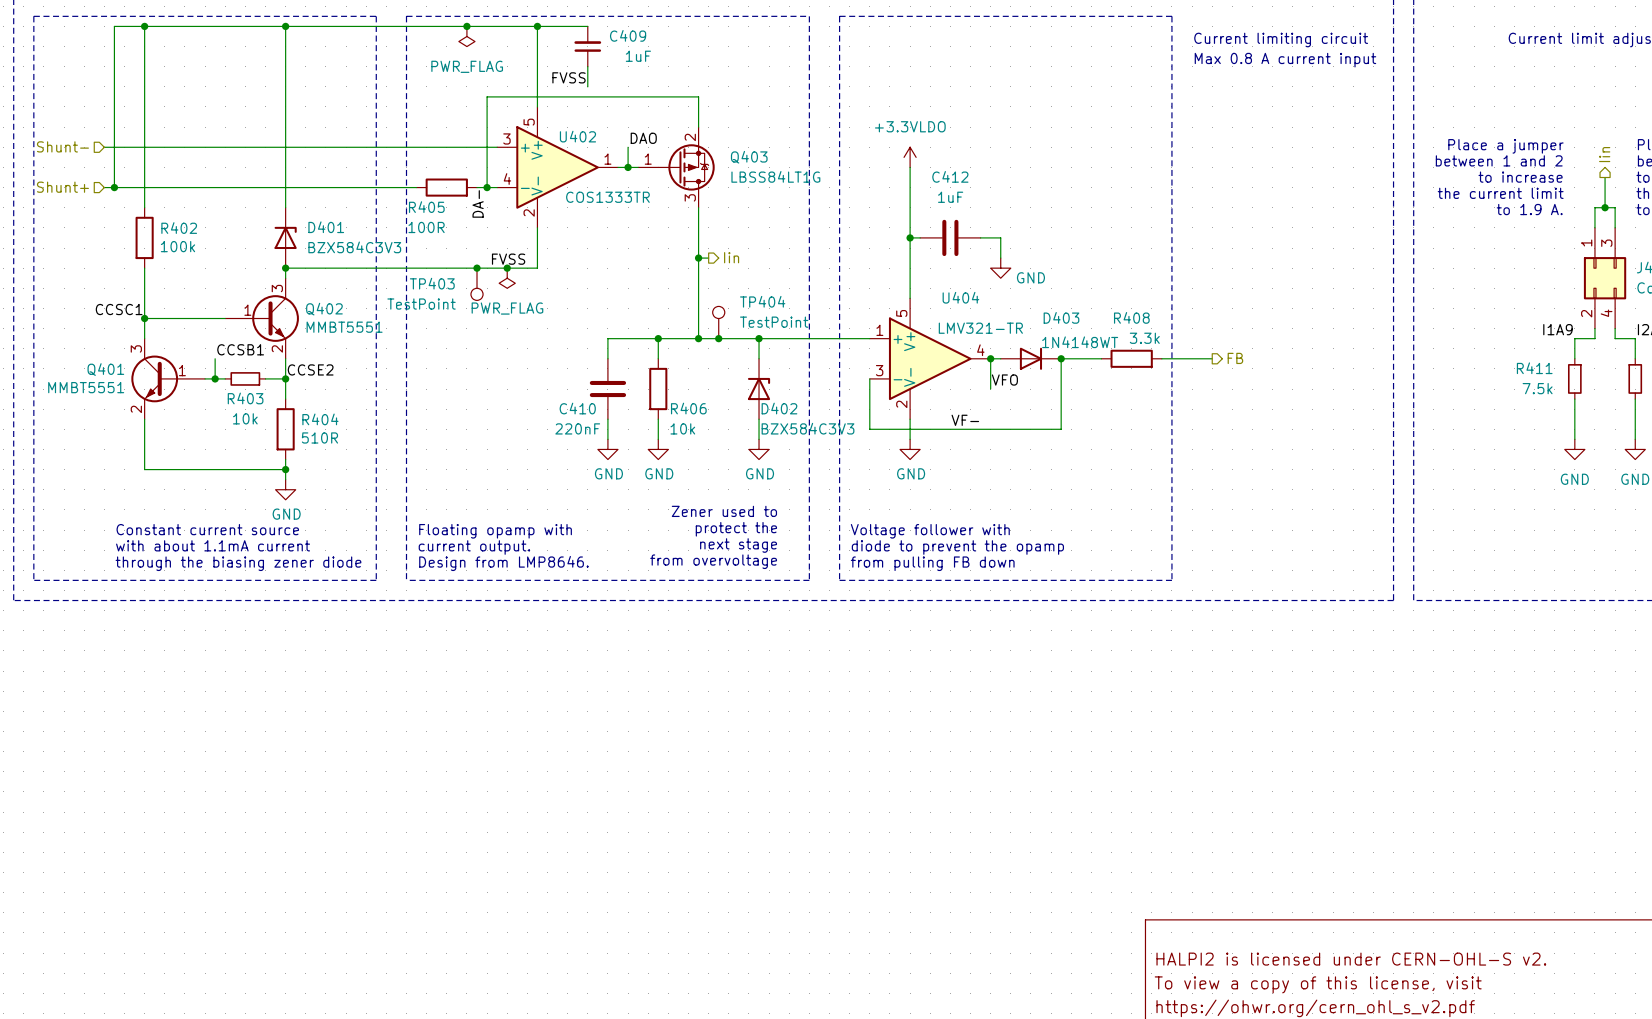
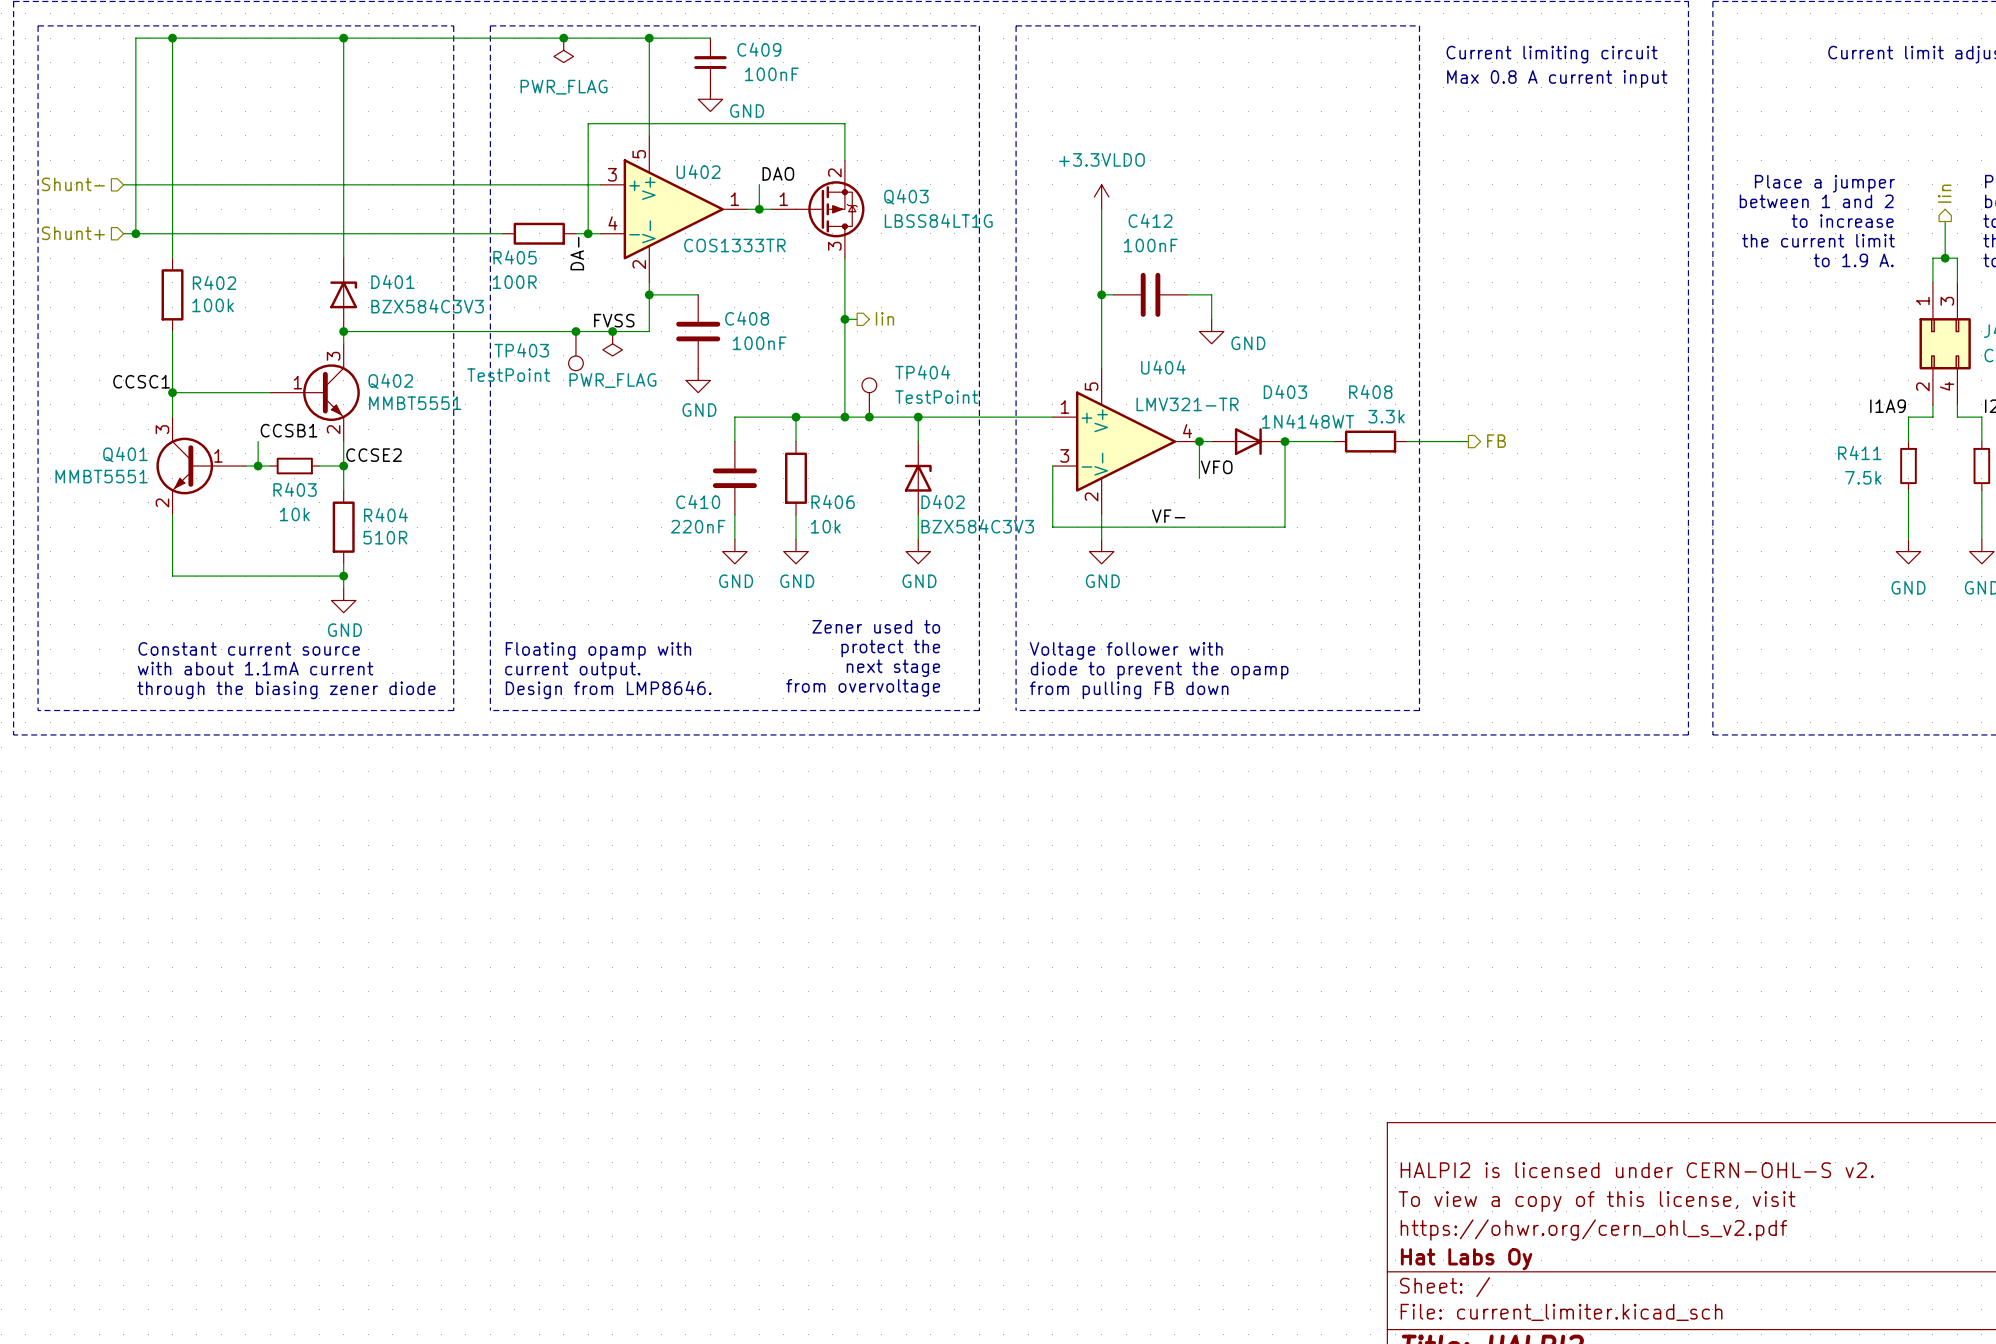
C409 value: 1uF (638, 56) -> 100nF (771, 74)
power symbol: none -> GND (710, 99)
label: FVSS (569, 77) -> none
C412 value: 1uF (950, 197) -> 100nF (1150, 245)
wire: none -> (649, 294) (698, 294)
junction: none -> (649, 294)
C408: none -> 100nF (698, 331)
power symbol: none -> GND (698, 380)

